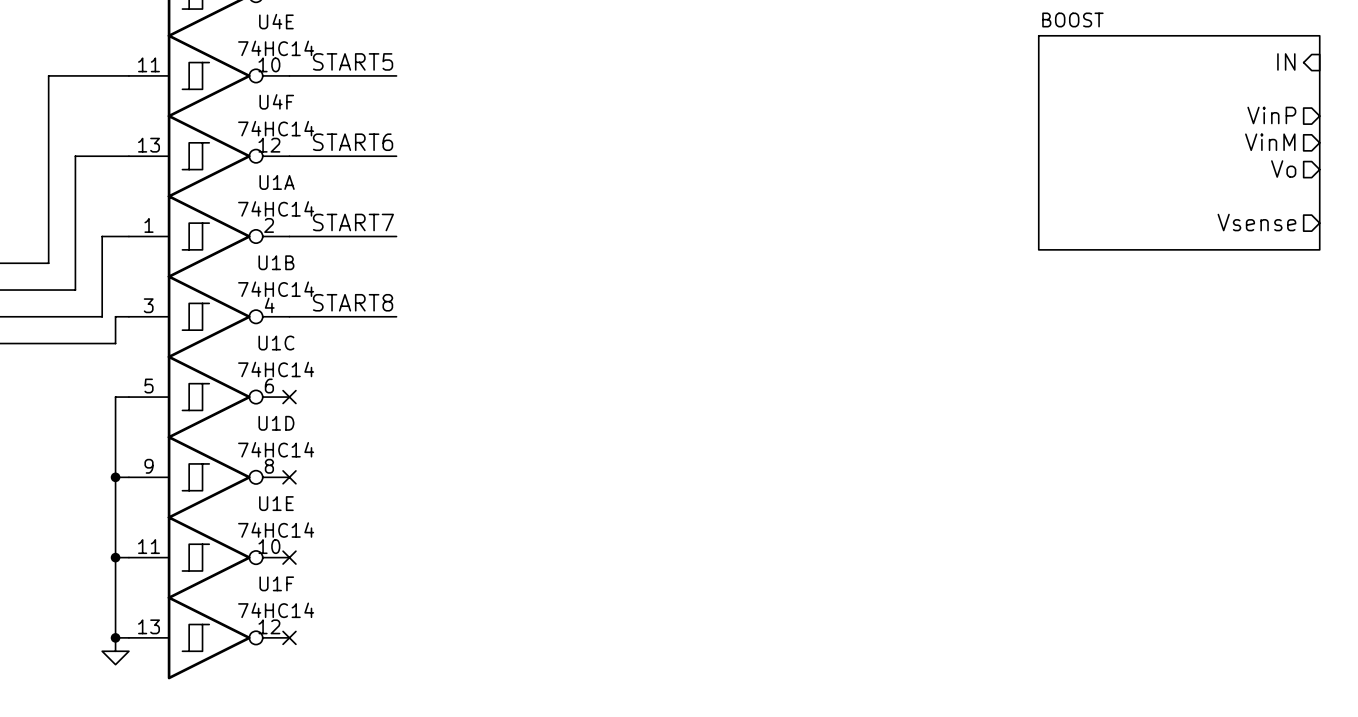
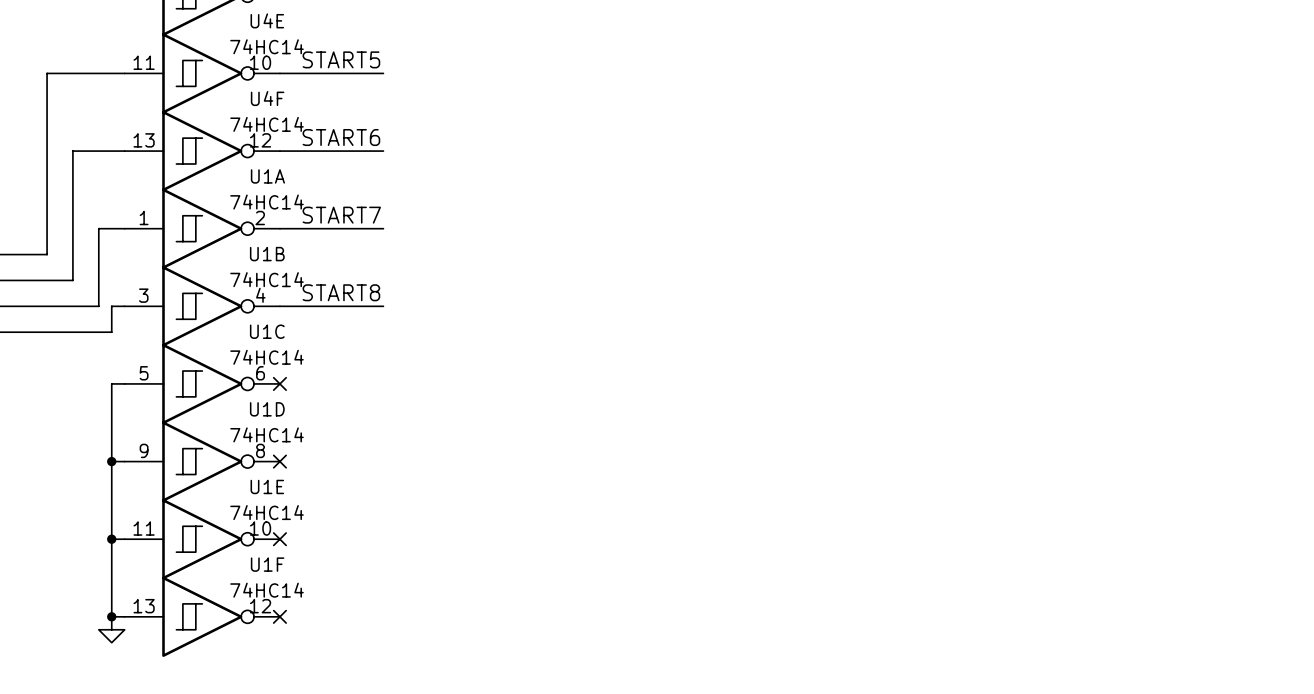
sheet pin: IN (1286, 61) -> none
sheet pin: VinP (1271, 115) -> none
sheet BOOST: (1179, 142) -> none
sheet pin: VinM (1270, 142) -> none
sheet pin: Vo (1283, 169) -> none
sheet pin: Vsense (1256, 222) -> none

